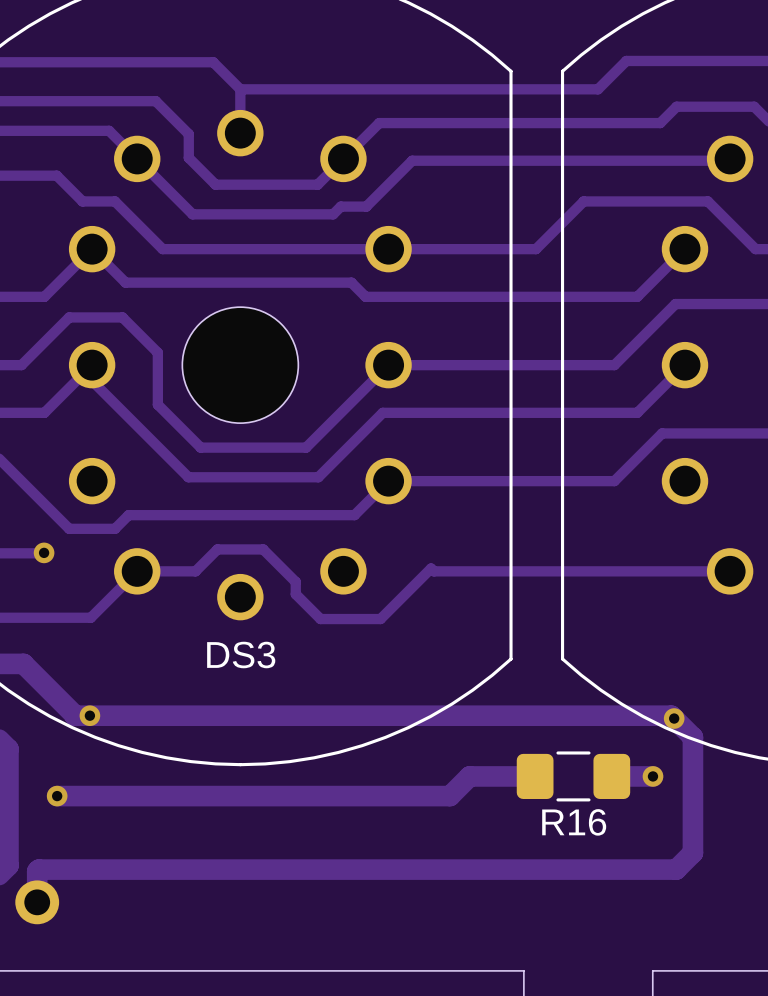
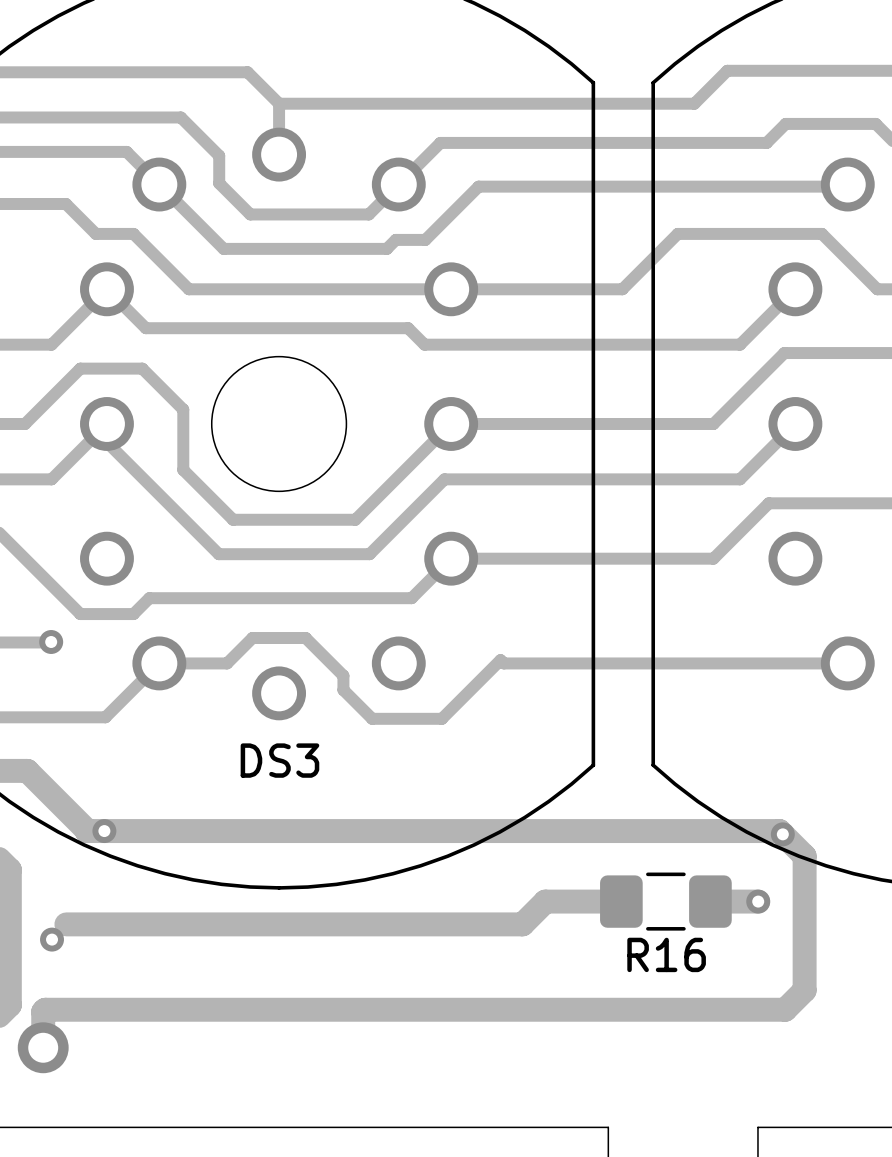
via position: (57, 796) -> (52, 939)

